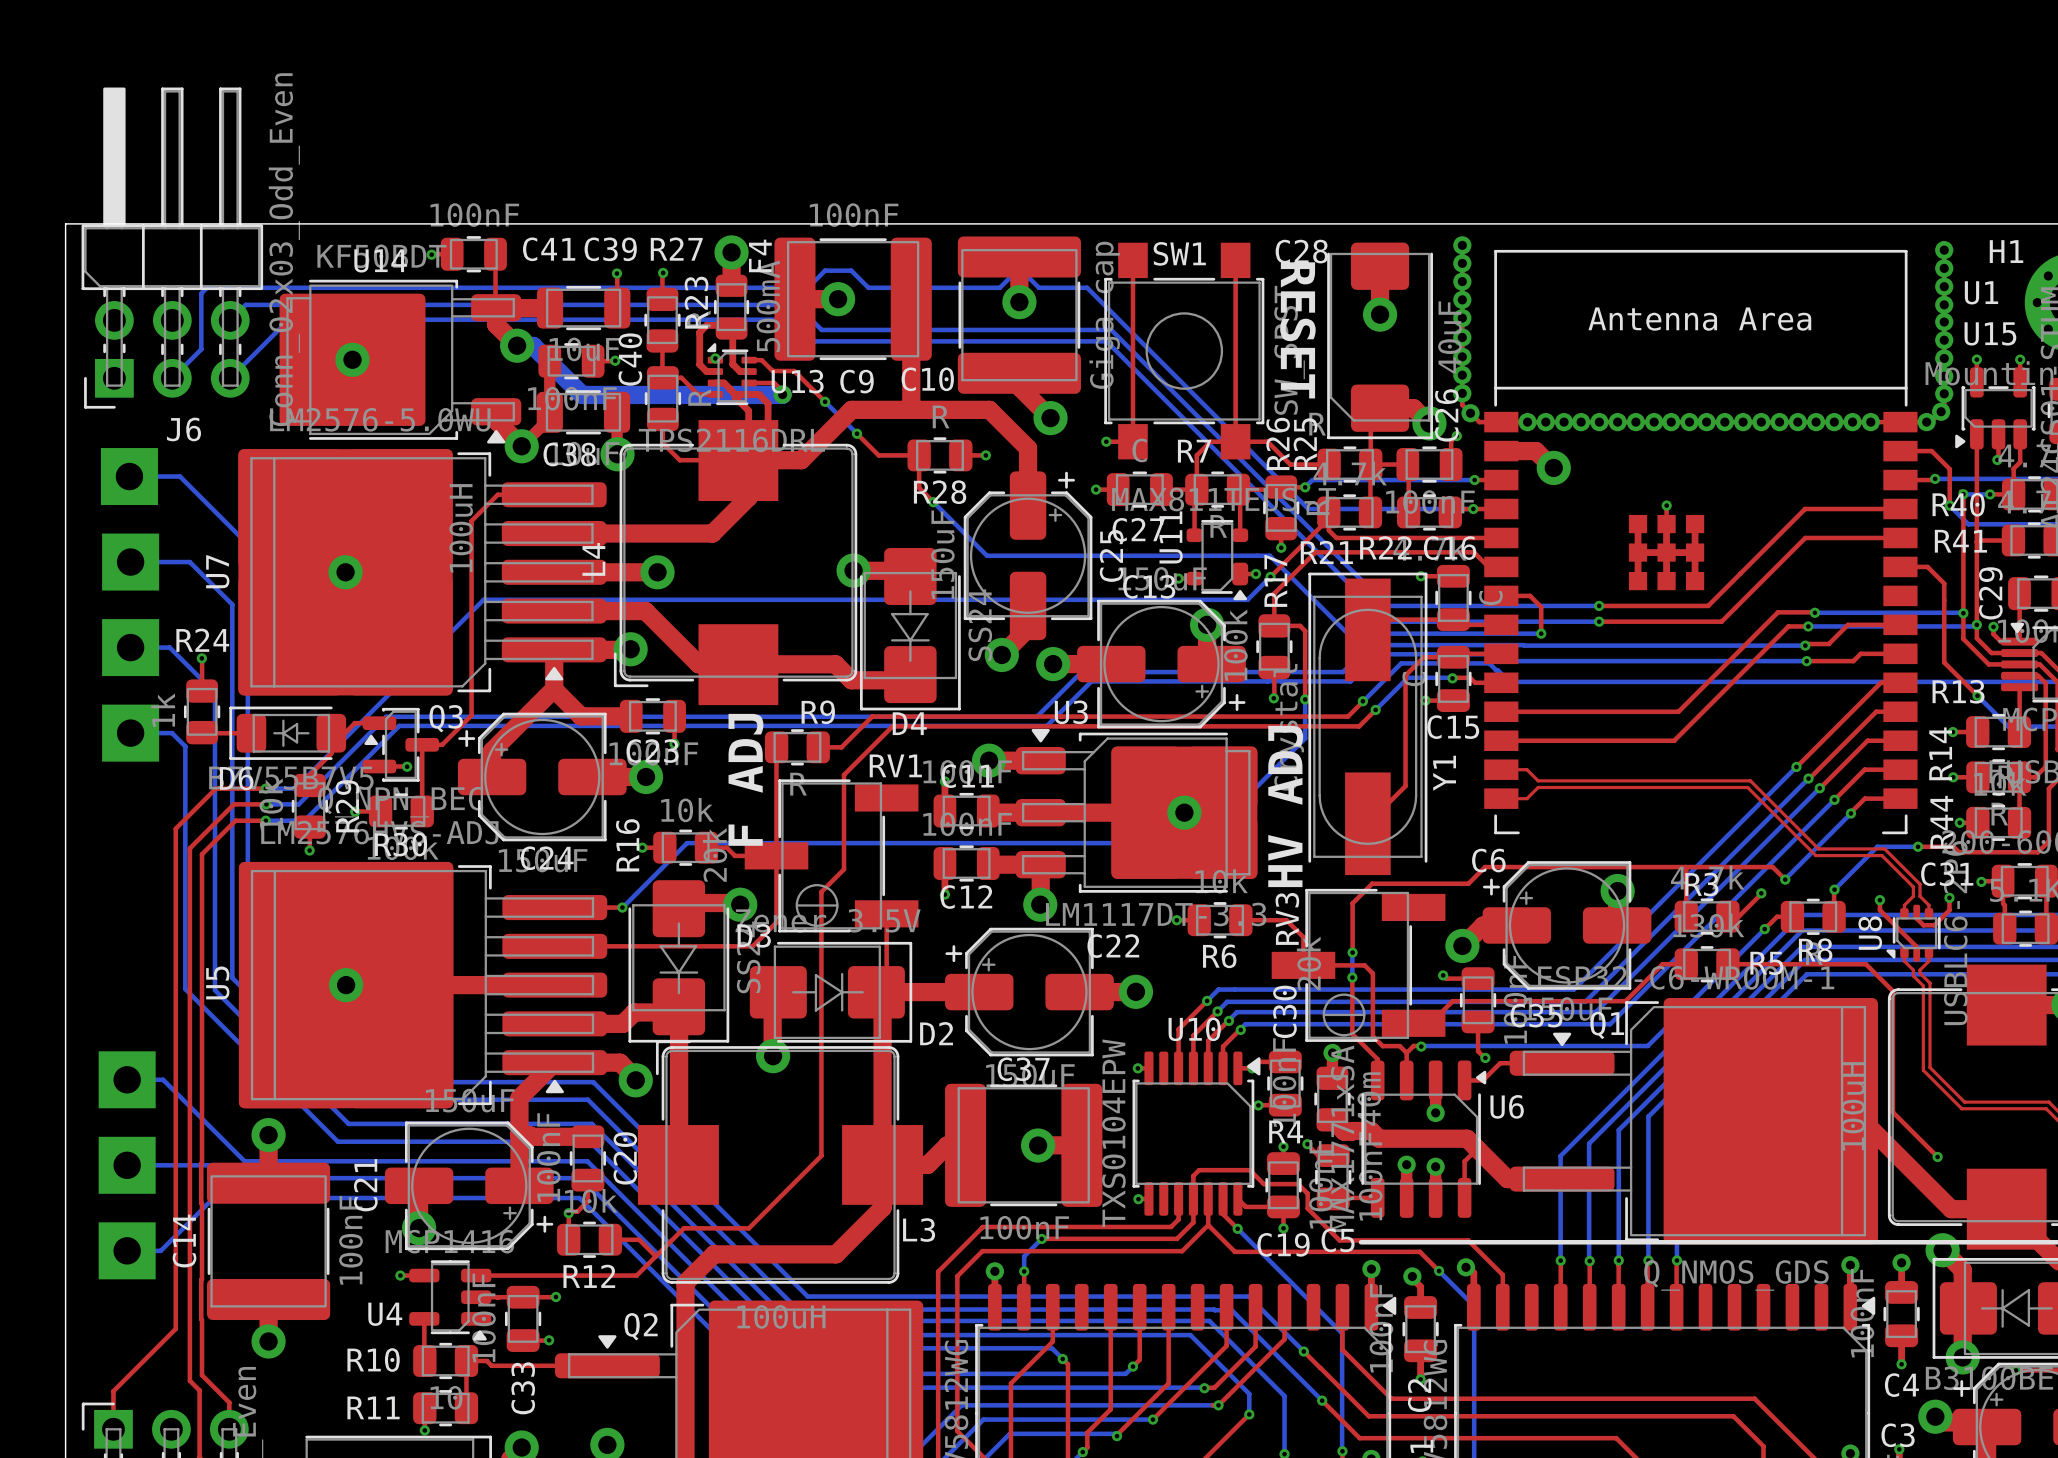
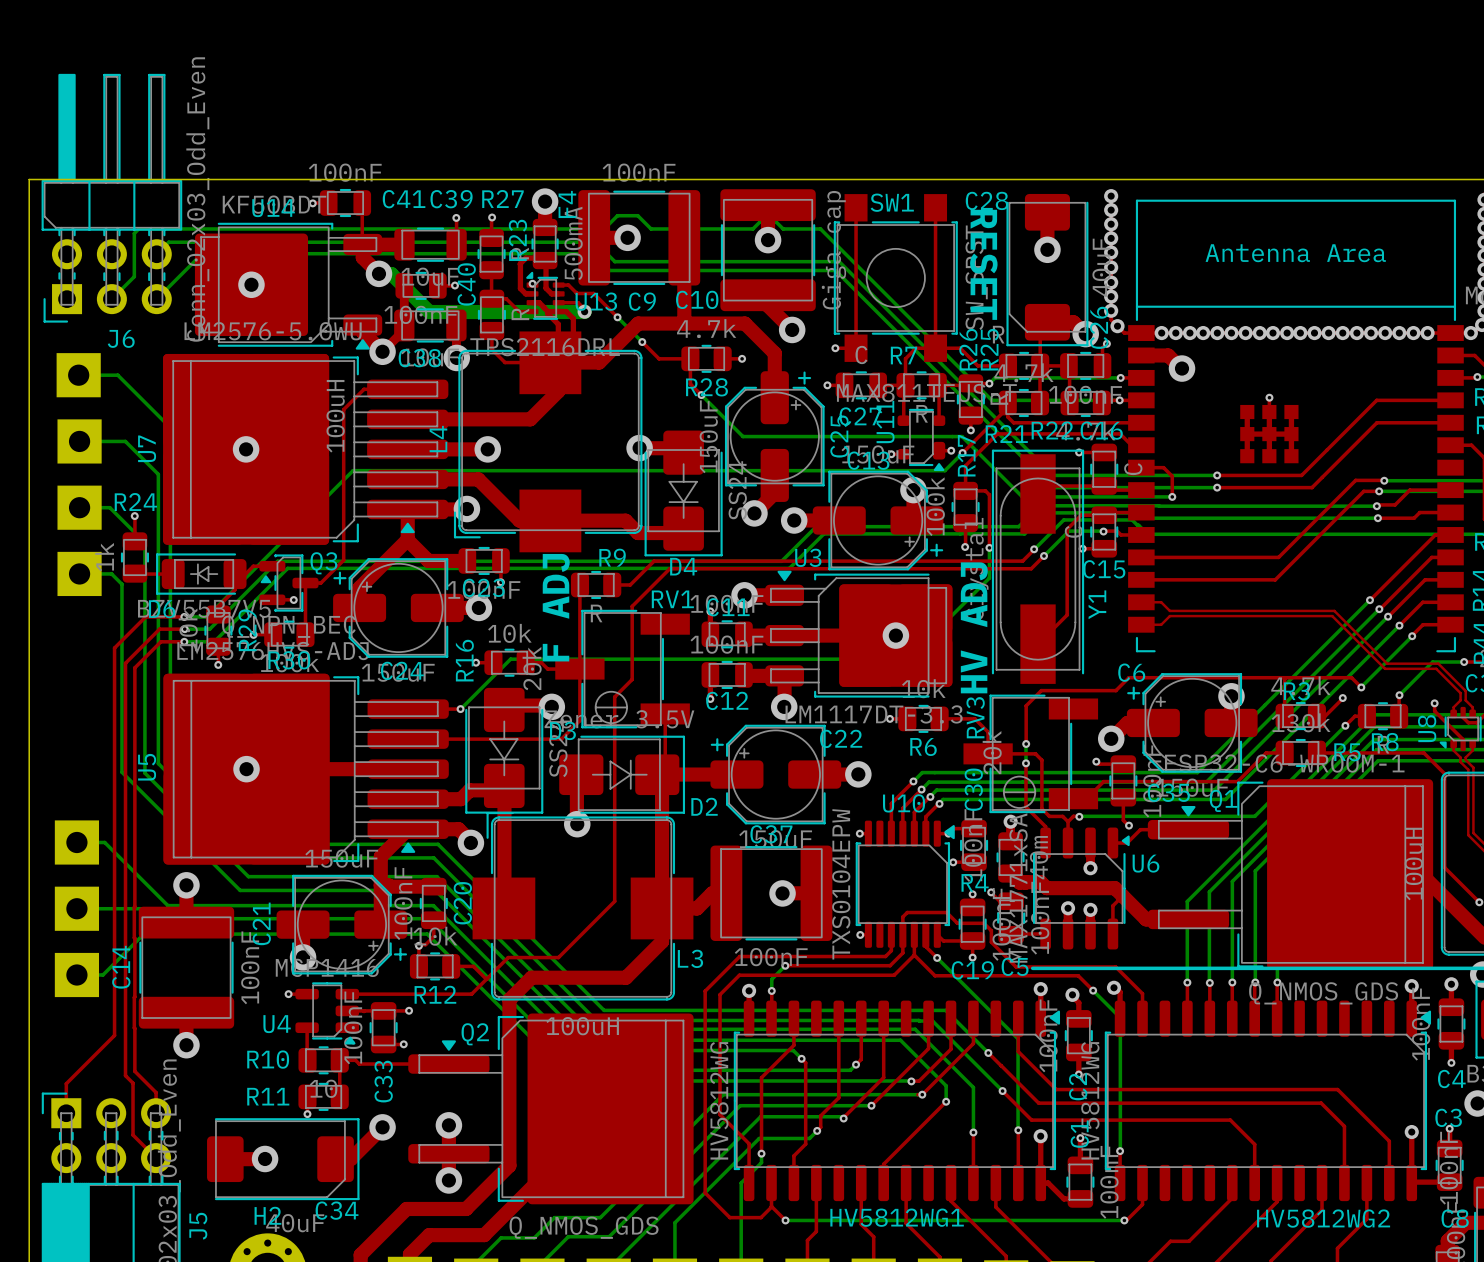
R28 value: R (941, 416) -> 4.7k (706, 328)

